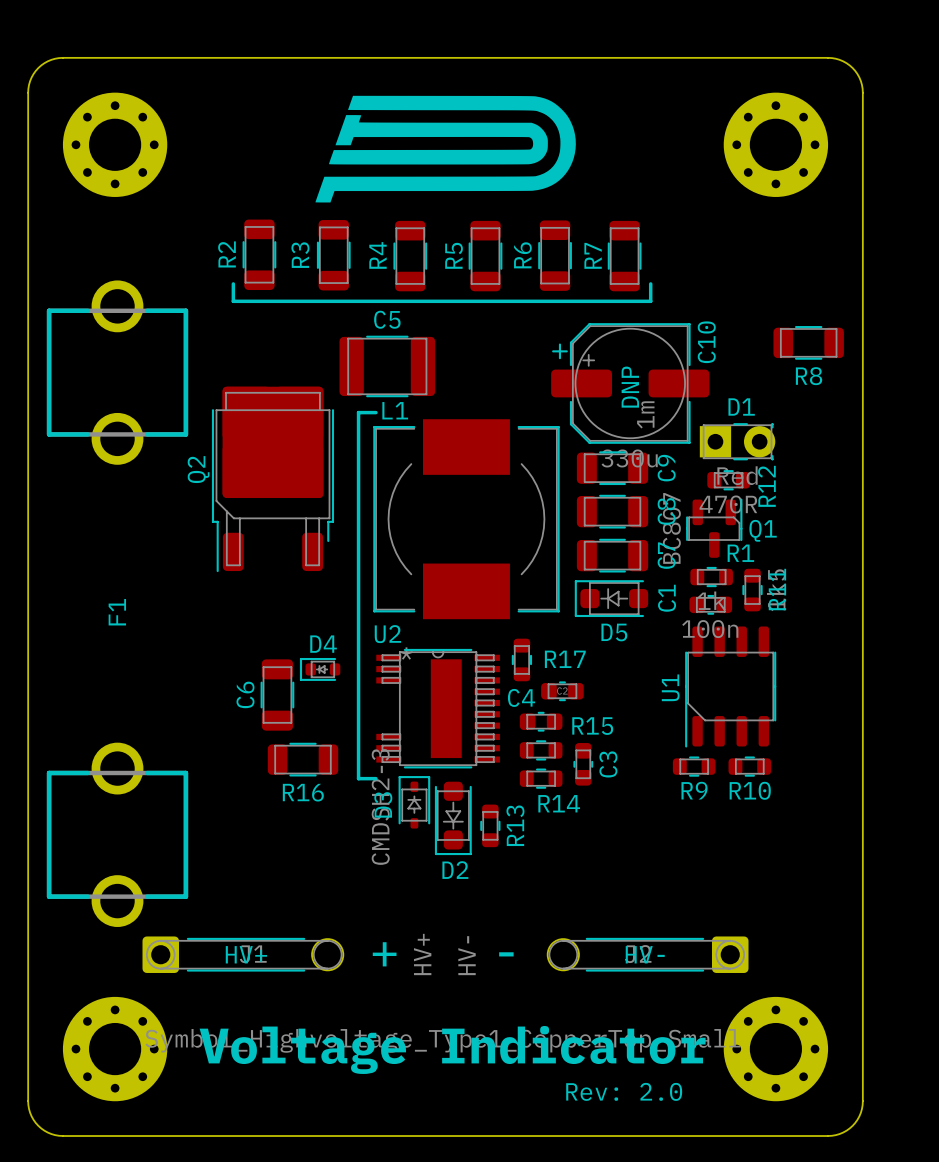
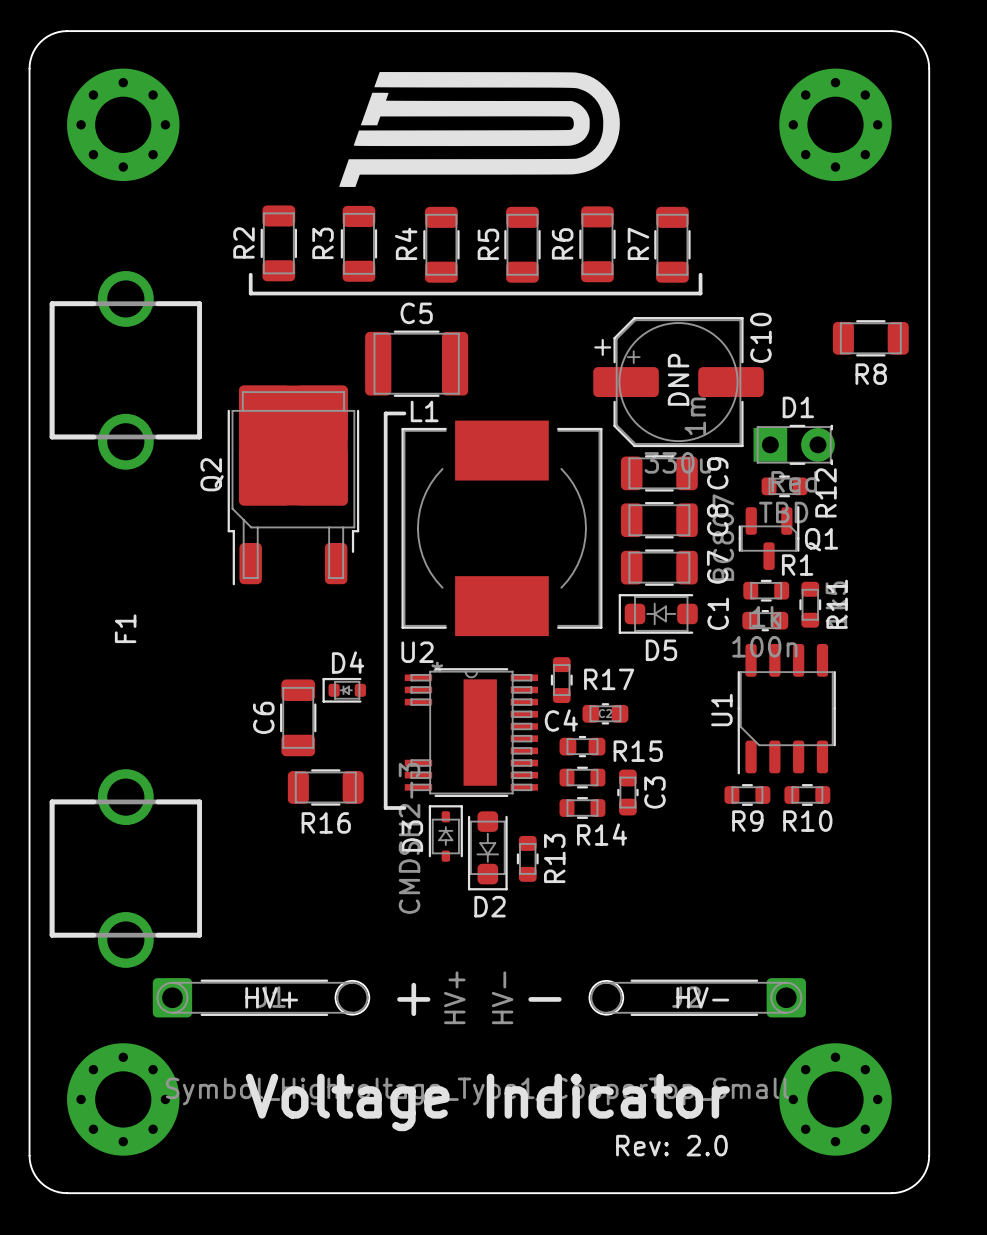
R12 value: 470R (728, 504) -> TBD (783, 512)

